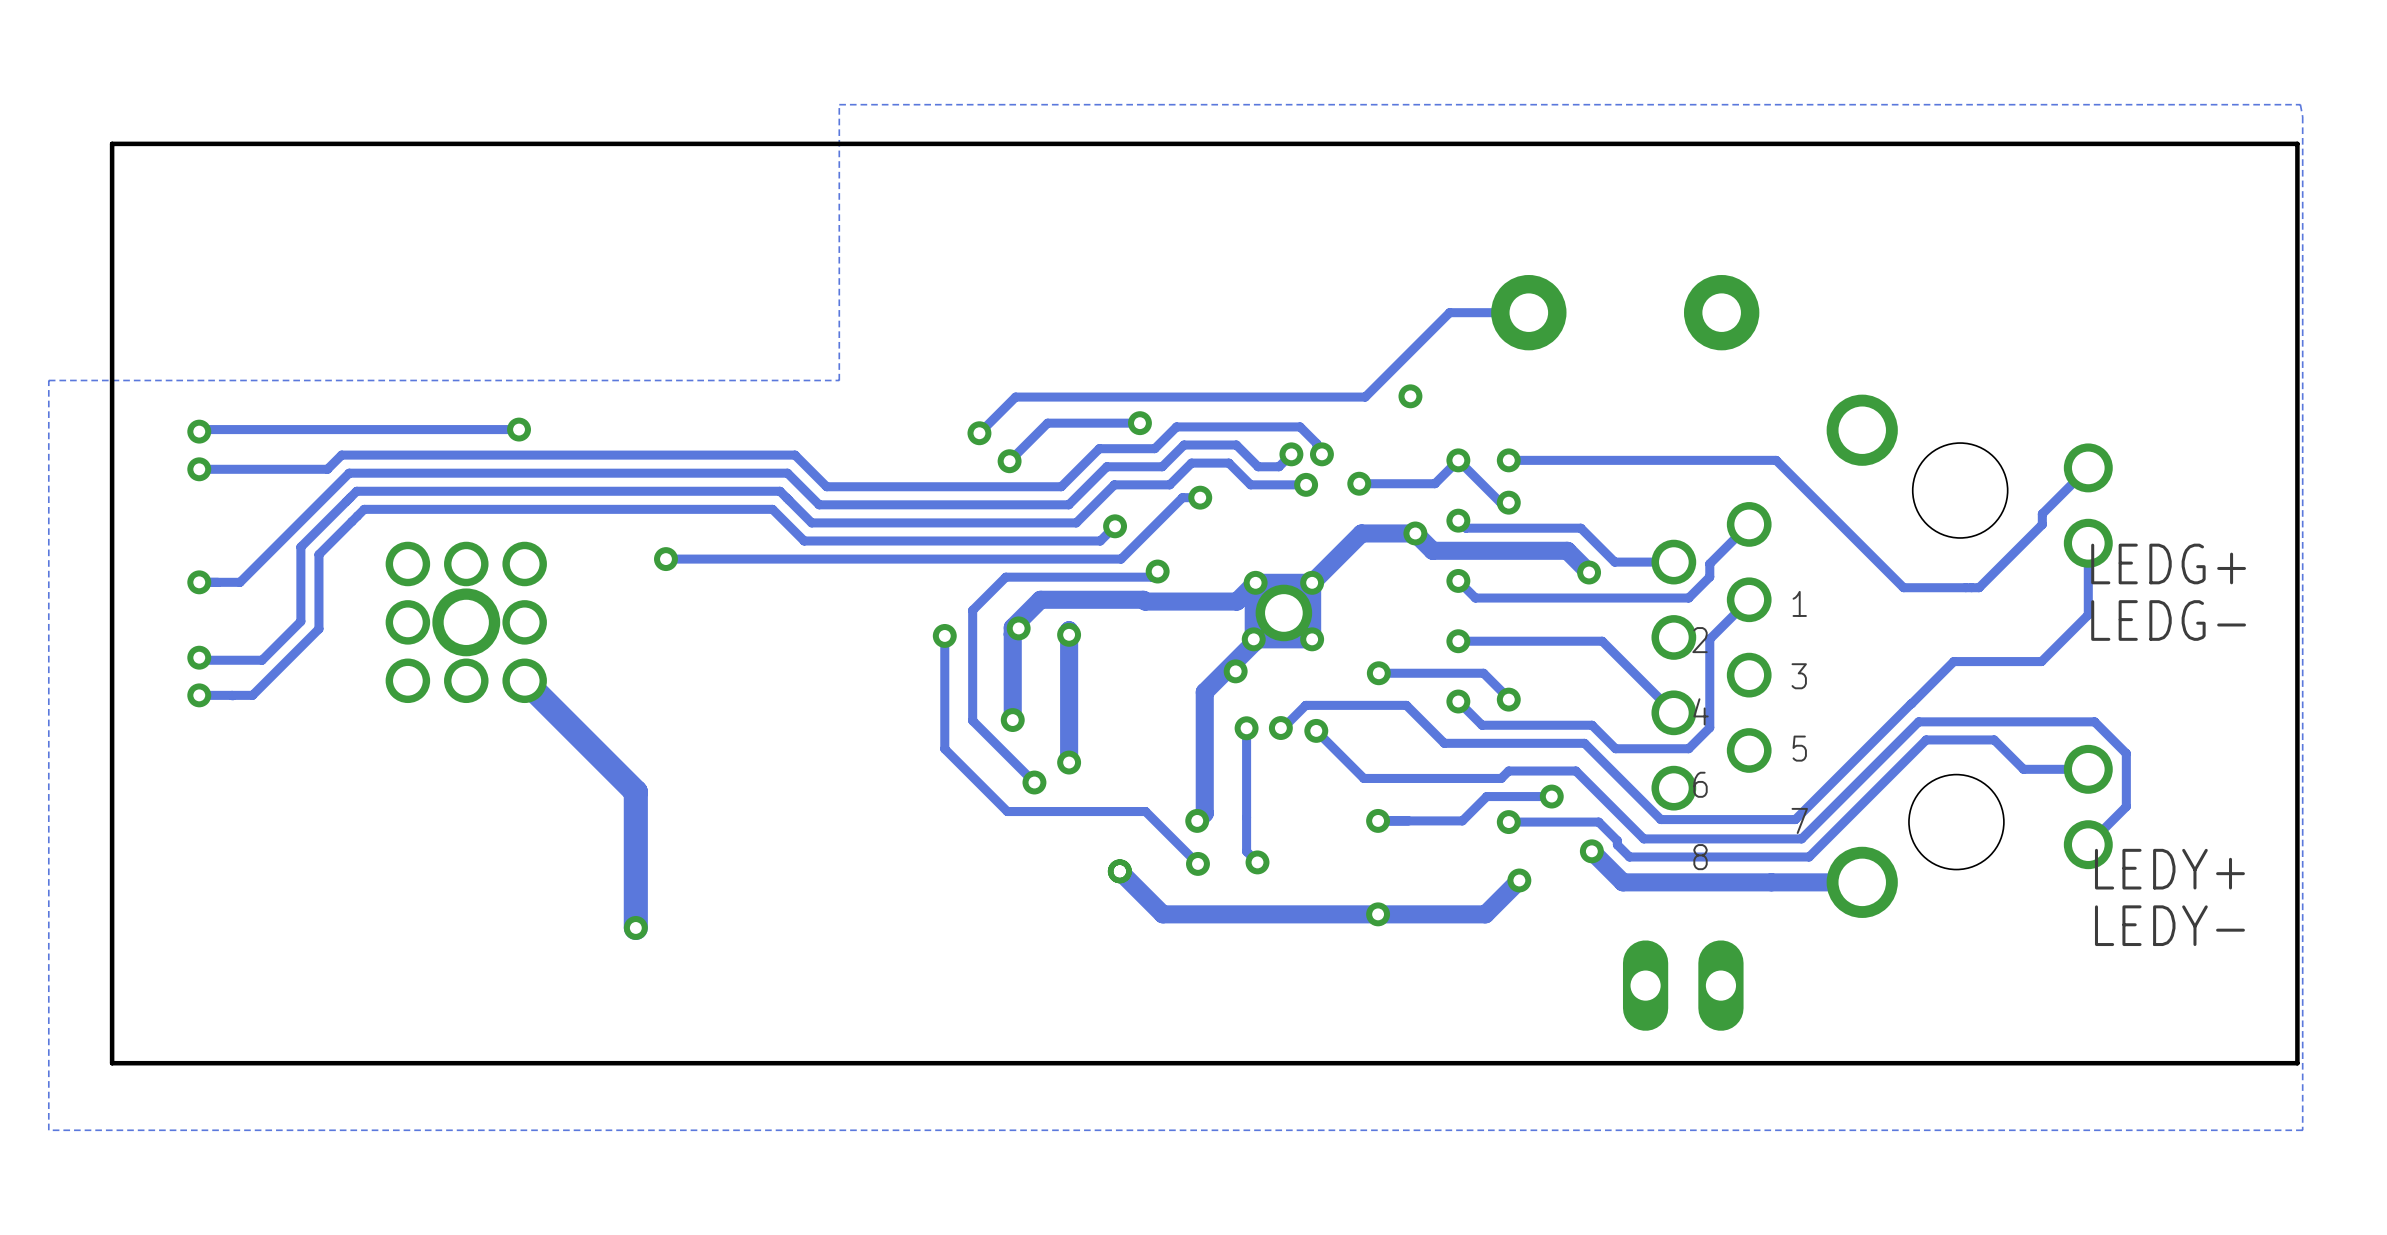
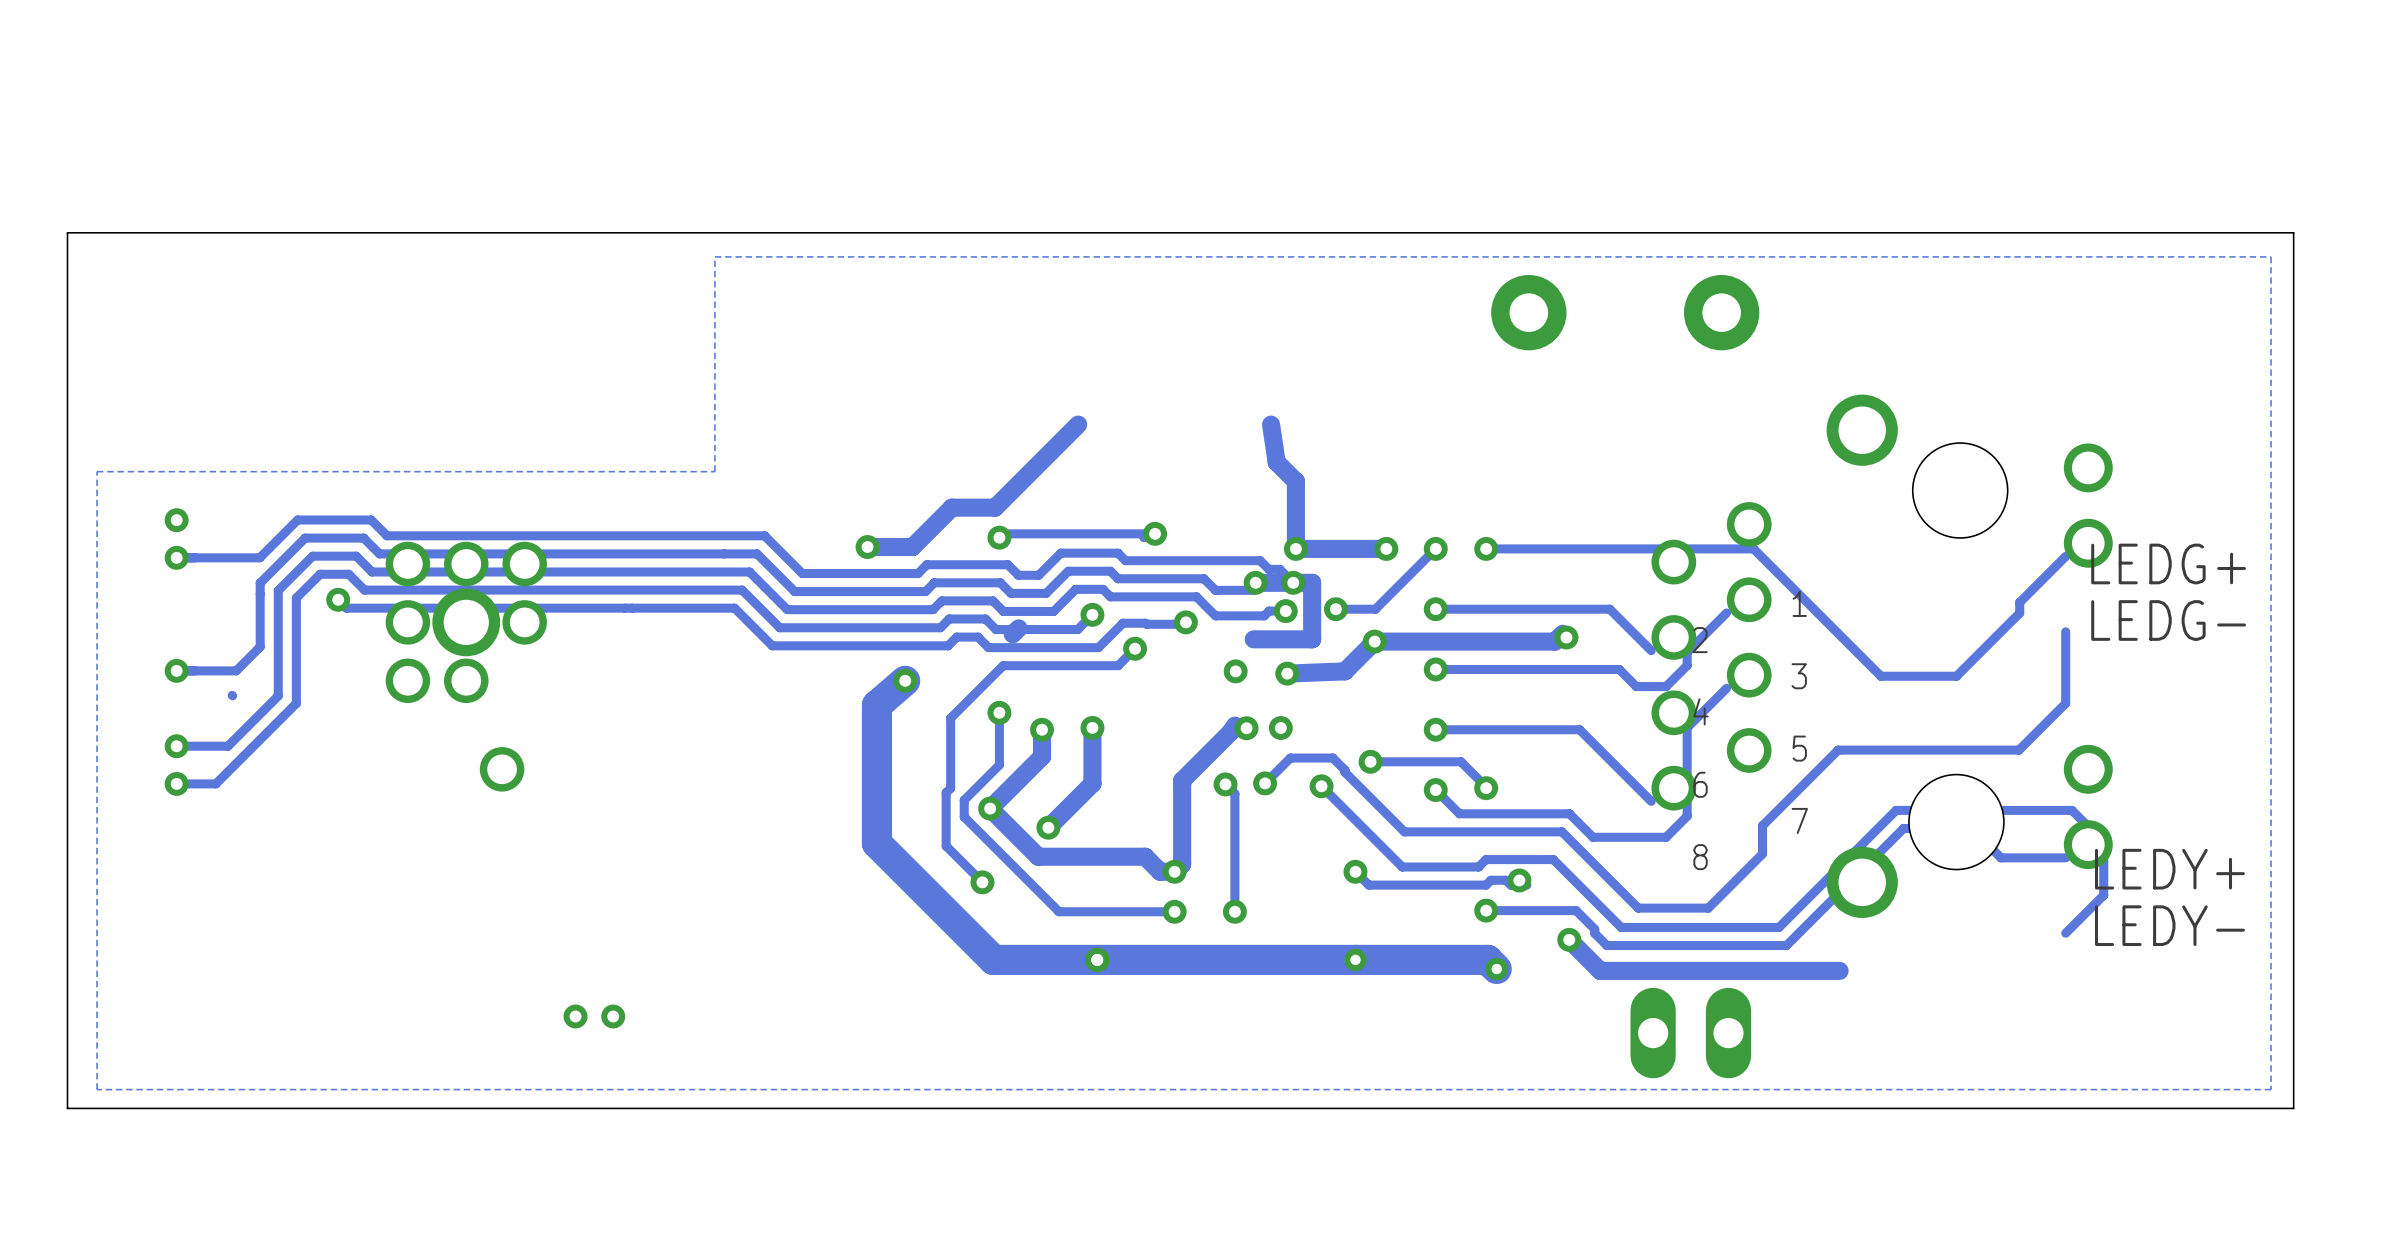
zone outline: (2300, 104) (839, 104) (839, 380) (48, 380) (48, 1130) (2302, 1130) (2302, 116) (2300, 104) -> (2271, 256) (2271, 1089) (97, 1089) (97, 471) (714, 471) (714, 256) (2271, 256)
board edge: (2297, 143) (2297, 1063) (112, 1063) (112, 143) (2297, 143) -> (2293, 232) (2293, 1108) (67, 1108) (67, 232) (2293, 232)
track: (1528, 312) (1449, 312) (1365, 397) (1015, 397) (979, 433) -> none
via: (1410, 396) -> none
track: (1139, 423) (1047, 423) (1009, 461) -> none
via: (1139, 423) -> none
track: none -> (1078, 424) (995, 507) (951, 507) (912, 547) (867, 547)
track: none -> (1271, 424) (1276, 462) (1295, 481) (1295, 548) (1386, 548)
track: (519, 429) (201, 429) -> none
via: (519, 429) -> none
via: (199, 431) -> none
via: (979, 433) -> none
track: (1291, 454) (1278, 466) (1258, 466) (1236, 445) (1184, 445) (1162, 466) (1106, 466) (1068, 504) (819, 504) (787, 473) (349, 473) (240, 582) (199, 582) -> none
via: (1291, 454) -> none
track: (1321, 454) (1316, 449) (1316, 443) (1300, 426) (1176, 426) (1154, 448) (1099, 448) (1061, 486) (826, 486) (795, 455) (341, 455) (327, 469) (199, 469) -> none
via: (1321, 454) -> none
via: (1458, 460) -> none
track: (1508, 460) (1776, 460) (1903, 587) (1979, 587) (2042, 524) (2042, 513) (2088, 467) -> (1486, 548) (1753, 548) (1880, 676) (1956, 676) (2019, 613) (2019, 602) (2065, 556)
via: (1508, 460) -> none
via: (1009, 461) -> none
via: (199, 469) -> none
track: (1359, 483) (1435, 483) (1458, 460) (1500, 502) (1508, 502) -> none
via: (1359, 483) -> none
track: (1306, 484) (1250, 484) (1228, 463) (1191, 463) (1169, 484) (1114, 484) (1076, 522) (811, 522) (780, 491) (356, 491) (300, 547) (300, 621) (262, 660) (201, 660) (199, 657) -> none
via: (1306, 484) -> none
track: (1200, 497) (1182, 497) (1121, 559) (665, 559) -> none
via: (1200, 497) -> none
via: (1508, 502) -> none
via: none -> (176, 520)
track: (1458, 520) (1465, 528) (1580, 528) (1614, 562) (1673, 562) -> none
via: (1458, 520) -> none
track: (1111, 522) (1115, 526) (1100, 541) (804, 541) (772, 509) (364, 509) (318, 554) (318, 628) (252, 695) (199, 695) -> none
track: (1749, 524) (1709, 563) (1709, 576) (1688, 598) (1475, 598) (1458, 580) -> none
via: (1115, 526) -> none
via: none -> (1155, 533)
via position: (1415, 533) -> (1435, 548)
via: none -> (999, 537)
track: none -> (1143, 537) (1155, 533) (1003, 533) (999, 537)
track: (2088, 543) (2088, 614) (2041, 661) (1953, 661) (1911, 703) -> none
via: none -> (867, 547)
via: none -> (1295, 548)
via: none -> (1386, 548)
track: none -> (1435, 548) (1375, 609) (1335, 609)
via: none -> (1486, 548)
track: none -> (176, 557) (259, 557) (297, 519) (371, 519) (387, 535) (764, 535) (802, 573) (918, 573) (926, 564) (1007, 564) (1018, 575) (1038, 575) (1060, 553) (1118, 553) (1125, 560) (1260, 560) (1268, 569) (1279, 569) (1293, 582)
via: none -> (176, 557)
via: (665, 559) -> none
track: (1157, 571) (1152, 577) (1005, 577) (972, 610) (972, 720) (1034, 782) -> none
via: (1157, 571) -> none
track: (1589, 572) (1567, 550) (1432, 550) (1415, 533) (1361, 533) (1312, 582) -> none
via: (1589, 572) -> none
via: (1458, 580) -> none
via: (199, 582) -> none
track: (1255, 582) (1236, 601) (1040, 599) (1012, 627) (1012, 720) -> none
via: none -> (1293, 582)
via: (1312, 582) -> none
track: (1253, 584) (1253, 643) (1204, 692) (1204, 813) (1197, 820) -> none
via size: [1255, 584, 1313, 642] -> [1273, 599, 1298, 624]
track: none -> (1253, 590) (1215, 590) (1203, 578) (1118, 578) (1110, 571) (1068, 571) (1046, 593) (1010, 593) (1000, 582) (934, 582) (925, 591) (794, 591) (757, 553) (379, 553) (363, 538) (305, 538) (260, 583) (260, 646) (236, 670) (177, 671)
track: none -> (338, 599) (346, 608) (734, 608) (772, 645) (948, 645) (956, 637) (977, 637) (988, 647) (1098, 647) (1122, 623) (1184, 624) (1185, 622)
via: none -> (338, 599)
track: (1749, 599) (1709, 639) (1709, 727) (1688, 748) (1615, 748) (1592, 725) (1482, 725) (1458, 701) -> (1726, 688) (1687, 727) (1687, 816) (1666, 837) (1592, 837) (1569, 813) (1459, 813) (1435, 790)
via: none -> (1335, 609)
via: none -> (1435, 609)
track: none -> (1088, 611) (1092, 614) (1077, 629) (996, 629) (985, 618) (949, 618) (940, 627) (779, 627) (742, 590) (364, 590) (348, 574) (320, 574) (296, 598) (296, 703) (215, 783) (176, 783)
track: none -> (1285, 611) (1269, 611) (1264, 615) (1215, 615) (1196, 596) (1110, 596) (1103, 589) (1075, 589) (1053, 611) (1003, 611) (992, 600) (941, 600) (933, 609) (787, 609) (749, 571) (372, 571) (356, 556) (312, 556) (278, 590) (278, 695) (227, 746) (176, 746)
track: none -> (1439, 612) (1435, 609) (1609, 609) (1651, 650)
track: none -> (1726, 612) (1687, 652) (1687, 665) (1666, 686) (1636, 686) (1619, 669) (1435, 669)
via: none -> (1185, 622)
via: (1018, 628) -> none
track: none -> (2065, 631) (2065, 703) (2018, 750) (1838, 750) (1762, 825) (1762, 853) (1708, 908) (1638, 908) (1561, 831) (1404, 831) (1332, 758) (1290, 758) (1265, 783)
track: (1069, 634) (1069, 630) (1069, 762) -> none
via position: (1069, 634) -> (1092, 614)
track: (944, 635) (944, 748) (1007, 811) (1145, 811) (1197, 863) -> none
via: (944, 635) -> none
track: none -> (1566, 637) (1562, 633) (1554, 641) (1374, 641) (1344, 671) (1283, 673)
via: none -> (1566, 637)
via: (1253, 639) -> none
via: (1312, 639) -> none
via: none -> (1374, 641)
track: (1458, 641) (1602, 641) (1673, 712) -> (1435, 729) (1579, 729) (1651, 801)
via: (1458, 641) -> none
track: none -> (1135, 648) (1118, 665) (1003, 665) (950, 718) (950, 788) (946, 792) (946, 846) (982, 882)
via: none -> (1135, 648)
via position: (199, 657) -> (176, 670)
via: none -> (1435, 669)
via: none -> (1287, 673)
track: (1378, 673) (1483, 673) (1508, 699) -> none
via: (1378, 673) -> none
track: (524, 680) (635, 791) (635, 927) -> none
via position: (524, 680) -> (502, 769)
track: none -> (905, 680) (876, 705) (876, 843) (993, 959) (1487, 959) (1496, 969)
via: none -> (905, 680)
via: (199, 695) -> none
via: (1508, 699) -> none
via: (1458, 701) -> none
track: (1911, 703) (1795, 819) (1660, 819) (1584, 743) (1444, 743) (1406, 705) (1305, 705) (1280, 728) -> none
track: none -> (999, 712) (999, 765) (964, 800) (964, 816) (1059, 911) (1174, 911)
via position: (1012, 720) -> (999, 712)
track: none -> (1234, 725) (1182, 780) (1182, 864) (1174, 871) (1160, 871) (1145, 856) (1038, 856) (990, 808) (1042, 756) (1042, 729)
track: none -> (1092, 727) (1092, 783) (1048, 827)
via: none -> (1092, 727)
track: (1246, 728) (1246, 851) (1257, 862) -> none
via: none -> (1042, 729)
via: none -> (1435, 729)
track: (1316, 730) (1363, 778) (1501, 778) (1508, 771) (1575, 771) (1643, 838) (1801, 838) (1918, 721) (2094, 721) (2126, 753) (2126, 806) (2088, 844) -> none
via: (1316, 730) -> none
via: none -> (176, 746)
track: none -> (1370, 761) (1460, 761) (1486, 788)
via: none -> (1370, 761)
via: (1069, 762) -> none
track: (2088, 769) (2023, 769) (1994, 739) (1926, 739) (1809, 857) (1629, 857) (1617, 844) (1617, 840) (1598, 822) (1508, 822) (1509, 819) -> (2065, 857) (2000, 857) (1971, 828) (1903, 828) (1786, 945) (1606, 945) (1594, 933) (1594, 929) (1576, 910) (1486, 910) (1487, 907)
via: (1034, 782) -> none
via: none -> (176, 783)
via: none -> (1265, 783)
track: none -> (1225, 784) (1234, 793) (1234, 911)
via: none -> (1225, 784)
track: none -> (1321, 786) (1402, 867) (1478, 867) (1486, 859) (1553, 859) (1621, 927) (1779, 927) (1896, 810) (2072, 810) (2103, 842) (2103, 895) (2065, 933)
via: none -> (1321, 786)
via: none -> (1486, 788)
via: none -> (1435, 790)
track: (1551, 796) (1486, 796) (1462, 820) (1378, 820) -> none
via: (1551, 796) -> none
via: none -> (990, 808)
via: (1197, 820) -> none
via: (1378, 820) -> none
via: (1508, 822) -> none
via: none -> (1048, 827)
track: (1591, 851) (1622, 882) (1862, 882) -> (1569, 939) (1600, 970) (1839, 970)
via: (1591, 851) -> none
via: (1257, 862) -> none
via position: (1197, 863) -> (1174, 871)
track: (1119, 871) (1162, 914) (1485, 914) (1519, 880) -> none
via: (1119, 871) -> none
track: none -> (1355, 871) (1368, 885) (1486, 885) (1490, 880) (1505, 880) (1510, 885) (1526, 885)
via: none -> (1355, 871)
via: none -> (982, 882)
via: none -> (1486, 910)
via: none -> (1174, 911)
via: none -> (1234, 911)
via: (1378, 914) -> none
via: (635, 927) -> none
via: none -> (1569, 939)
via: none -> (1097, 959)
via: none -> (1355, 959)
via: none -> (1496, 969)
part position: (1683, 985) -> (1690, 1033)
via: none -> (575, 1016)
via: none -> (613, 1016)

